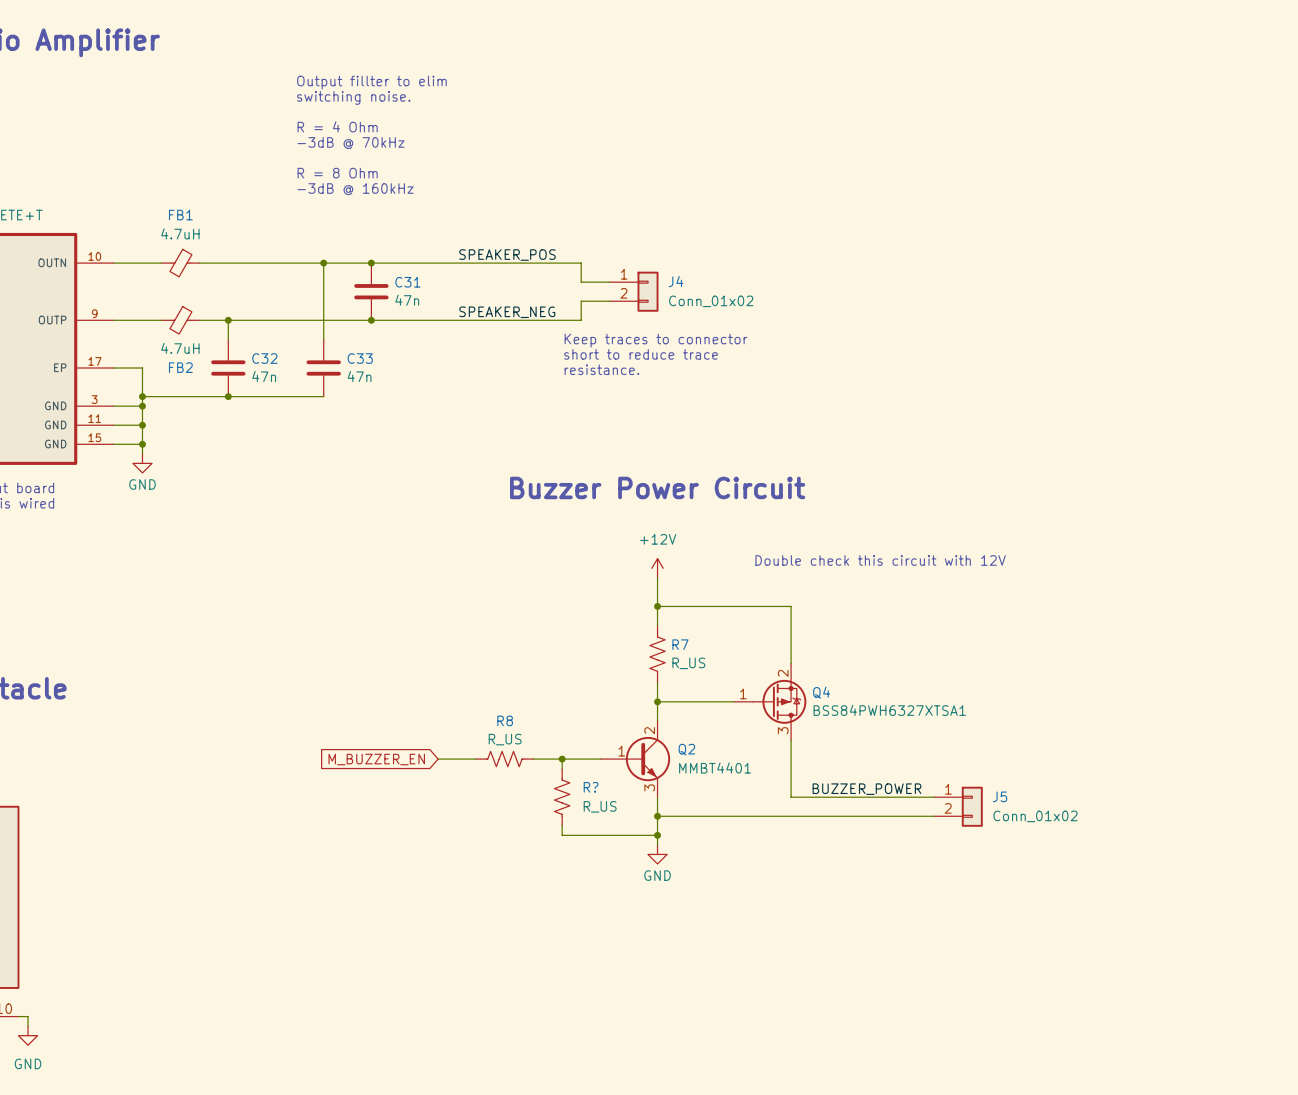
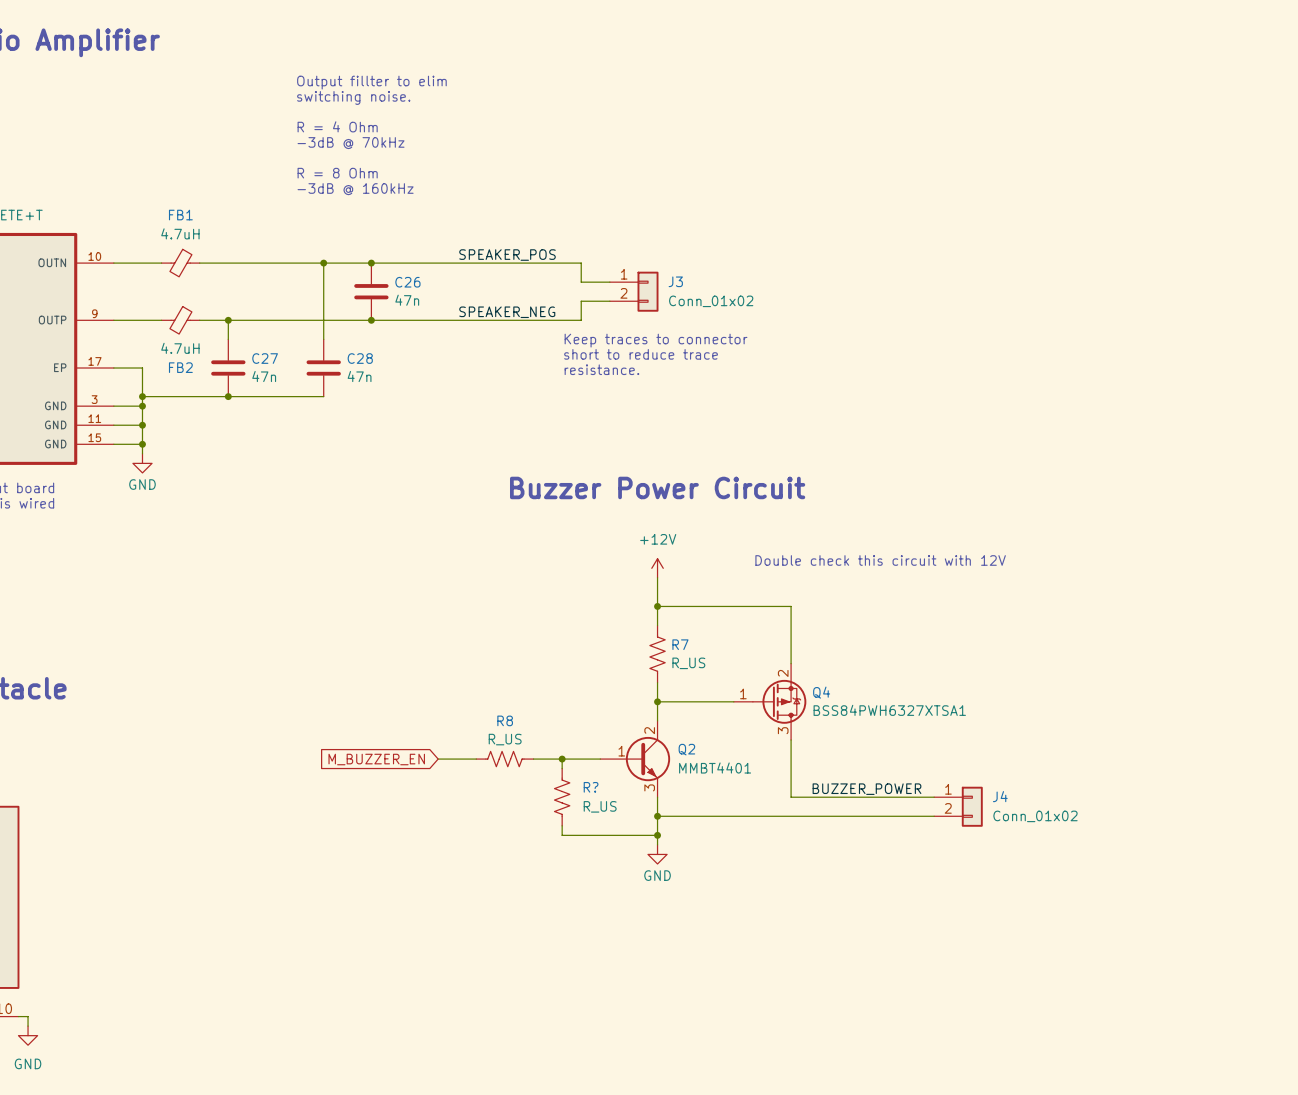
J4 name: J4 (676, 281) -> J3 (675, 281)
C31 name: C31 (407, 282) -> C26 (407, 282)
C32 name: C32 (264, 358) -> C27 (265, 358)
C33 name: C33 (360, 358) -> C28 (360, 358)
J5 name: J5 (1000, 796) -> J4 (1000, 796)

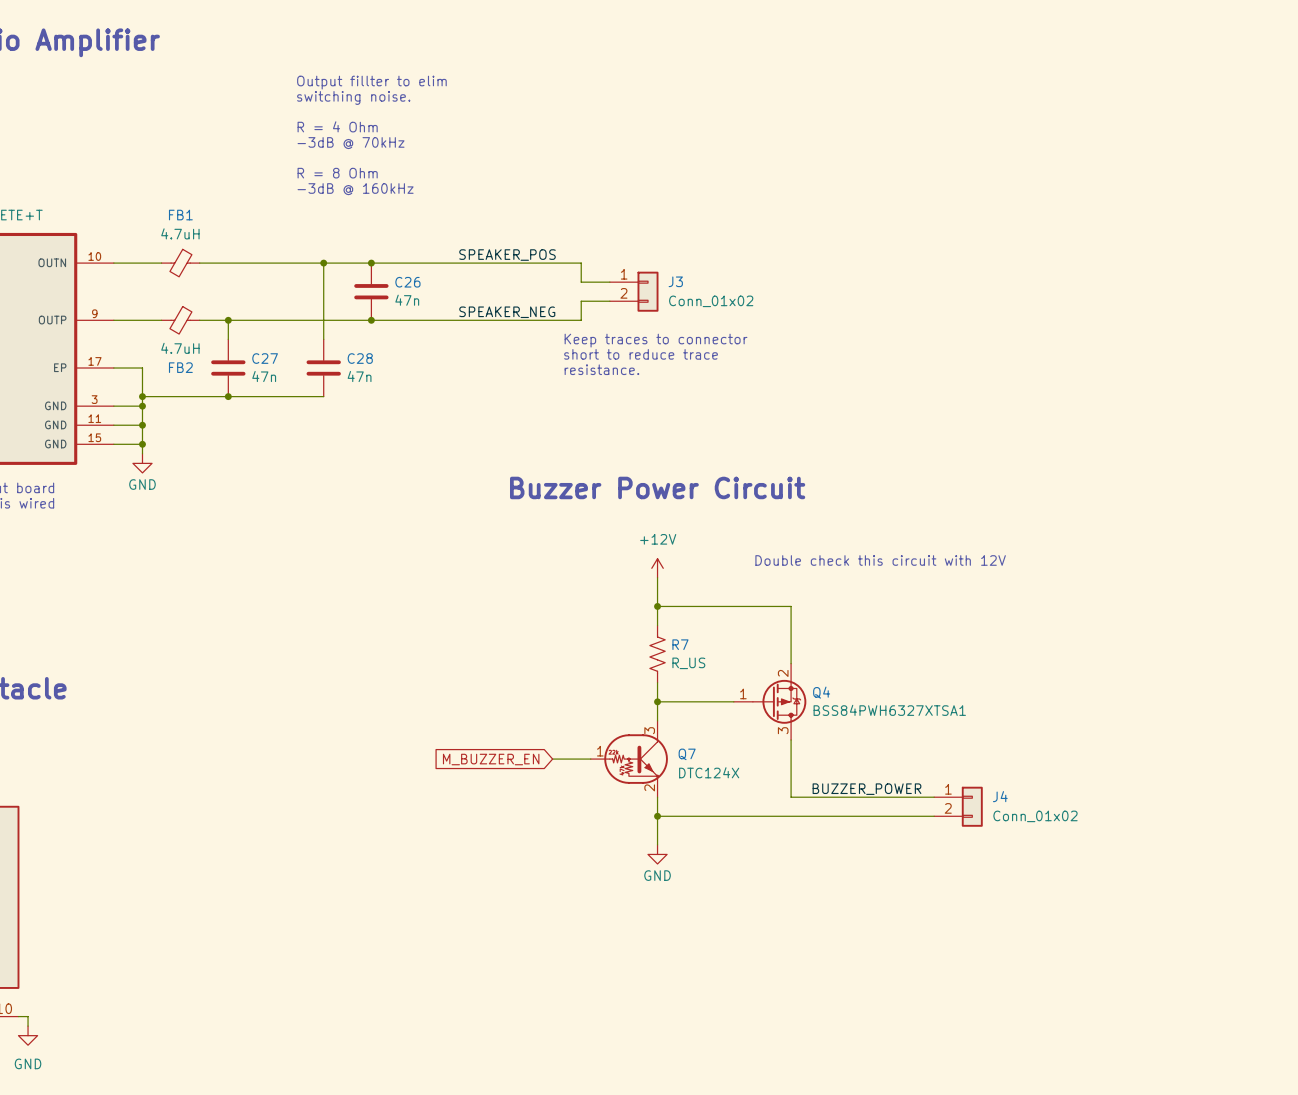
global label position: M_BUZZER_EN (376, 759) -> M_BUZZER_EN (491, 759)
wire: (438, 759) (476, 759) -> none
R8: R_US (504, 759) -> none
wire: (533, 759) (552, 759) -> none
wire: (562, 759) (562, 768) -> none
junction: (562, 759) -> none
Q7: none -> DTC124X (629, 759)
Q2: MMBT4401 (635, 759) -> none
R?: R_US (562, 797) -> none
wire: (562, 825) (562, 835) (657, 835) -> none
junction: (657, 835) -> none

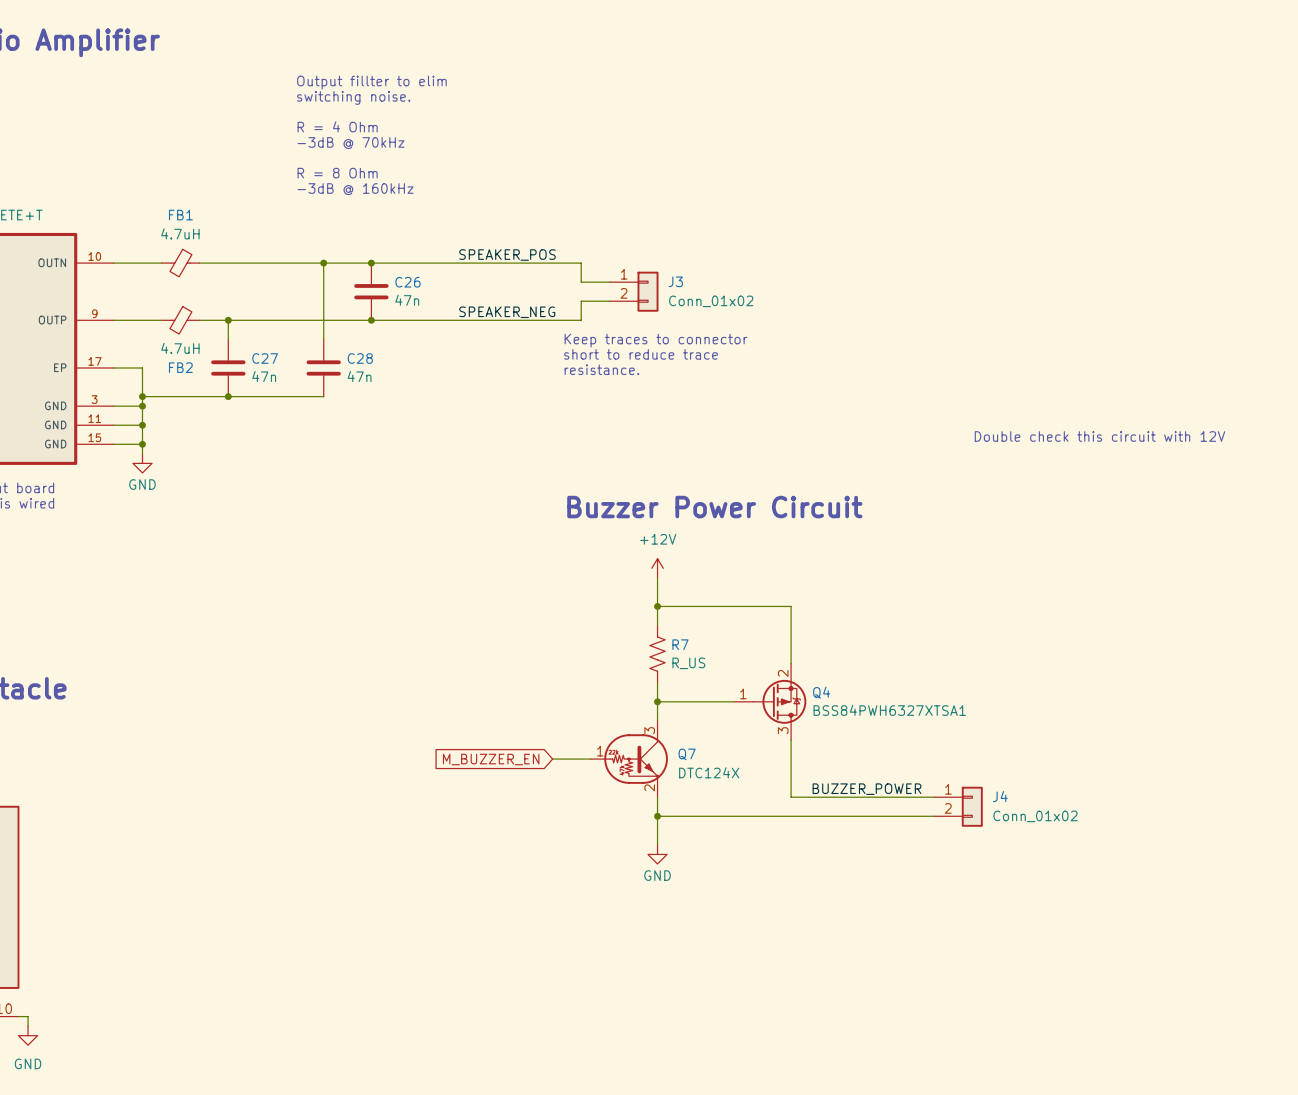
text: none -> Double check this circuit with 12V (1099, 436)
text position: Buzzer Power Circuit (657, 487) -> Buzzer Power Circuit (714, 507)
text: Double check this circuit with 12V (880, 560) -> none

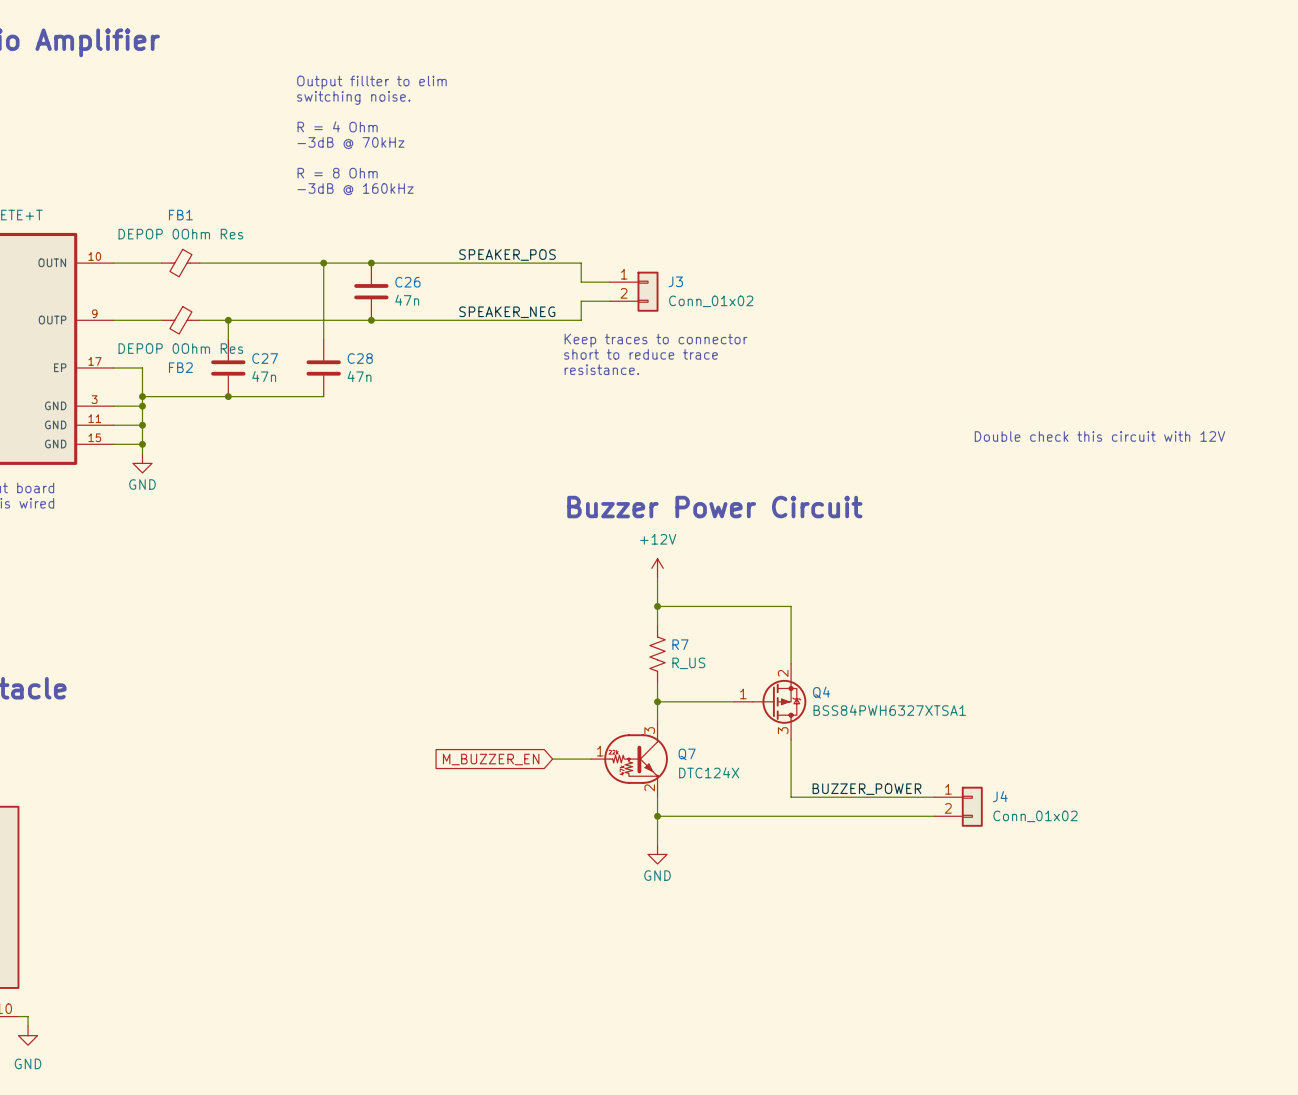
FB1 value: 4.7uH (180, 233) -> DEPOP 0Ohm Res (180, 234)
FB2 value: 4.7uH (180, 348) -> DEPOP 0Ohm Res (180, 348)

